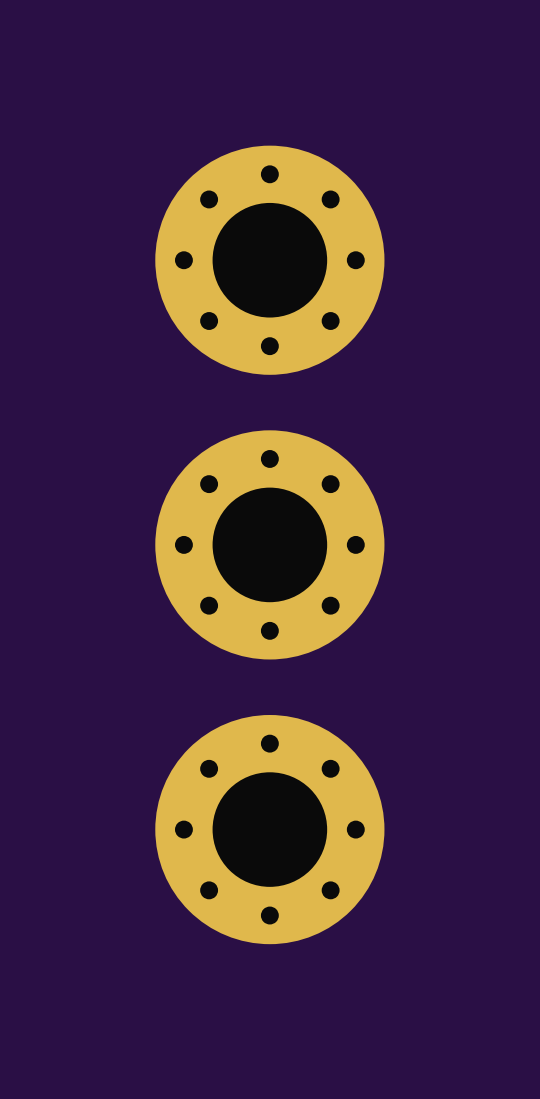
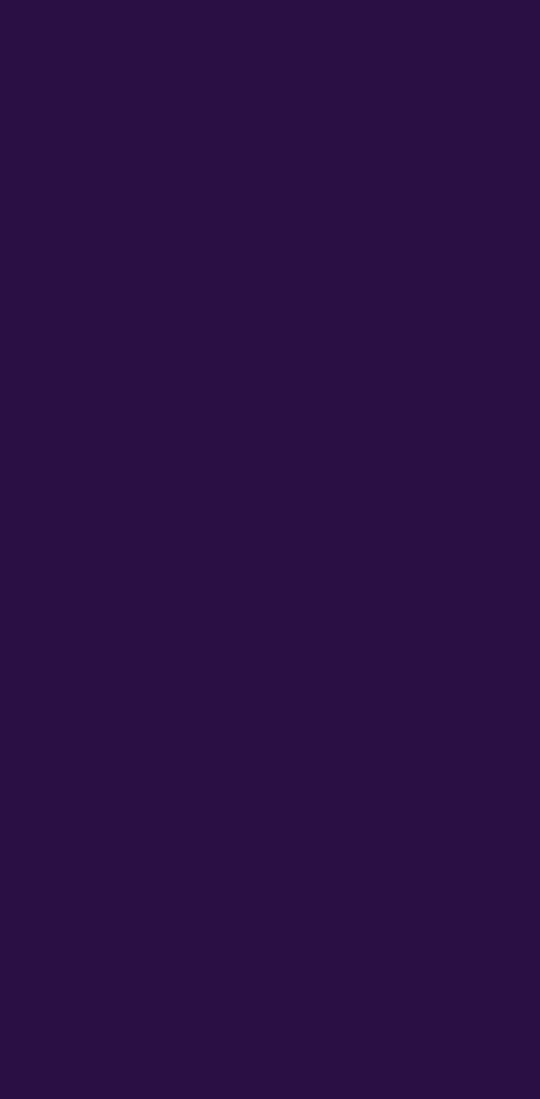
part: (269, 260) -> none
part: (269, 544) -> none
part: (269, 829) -> none

